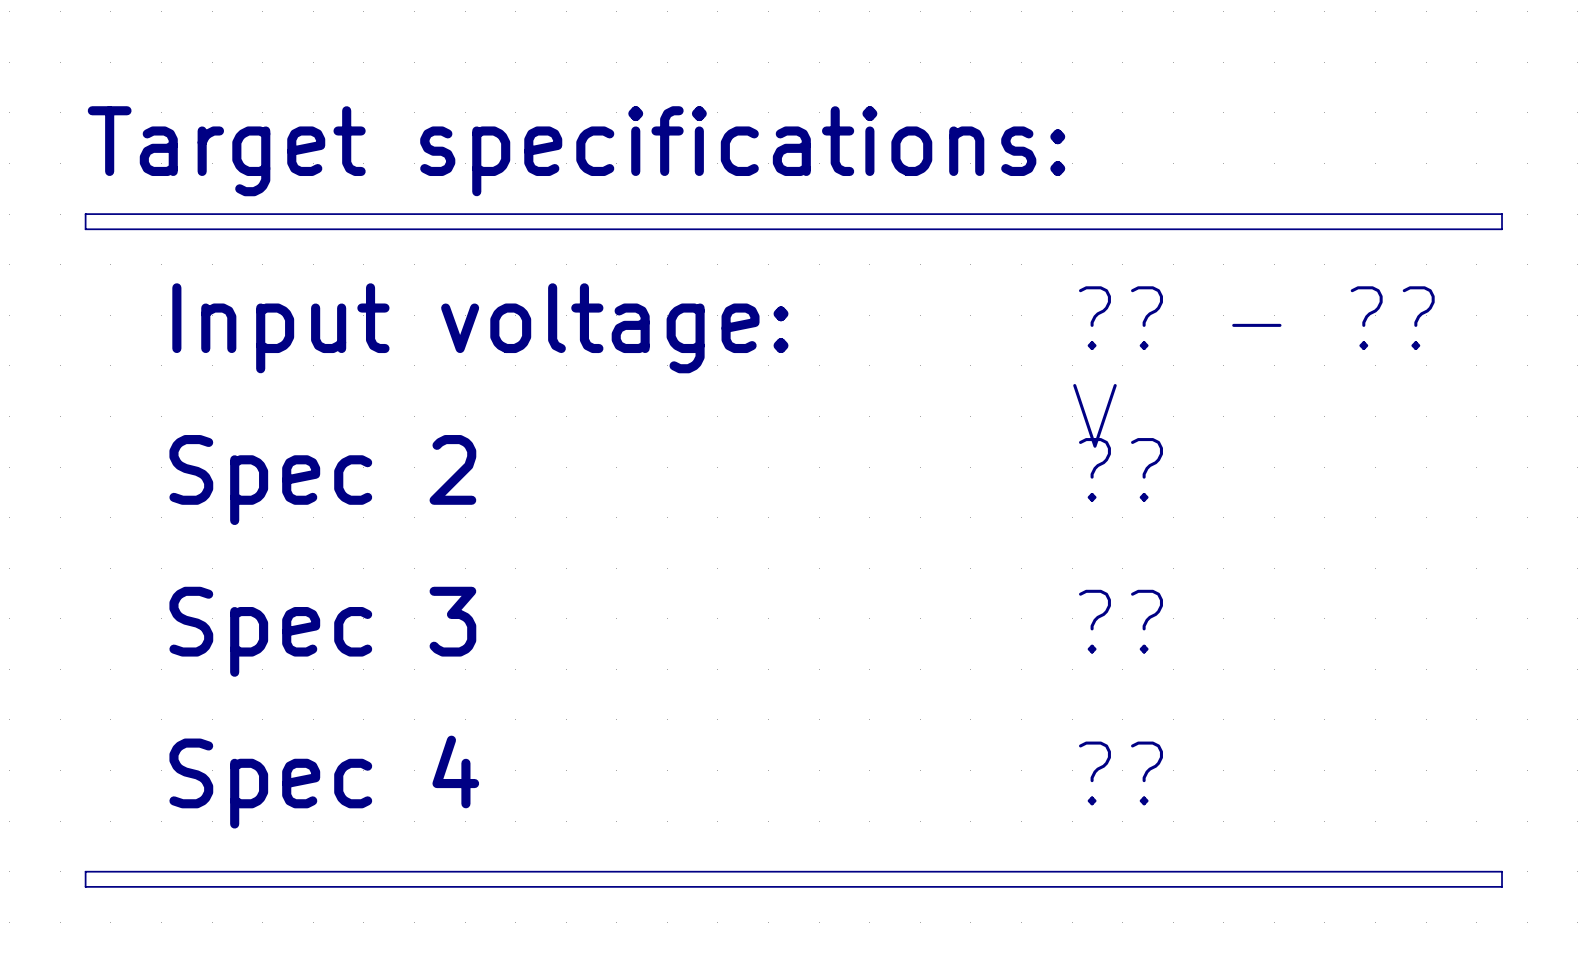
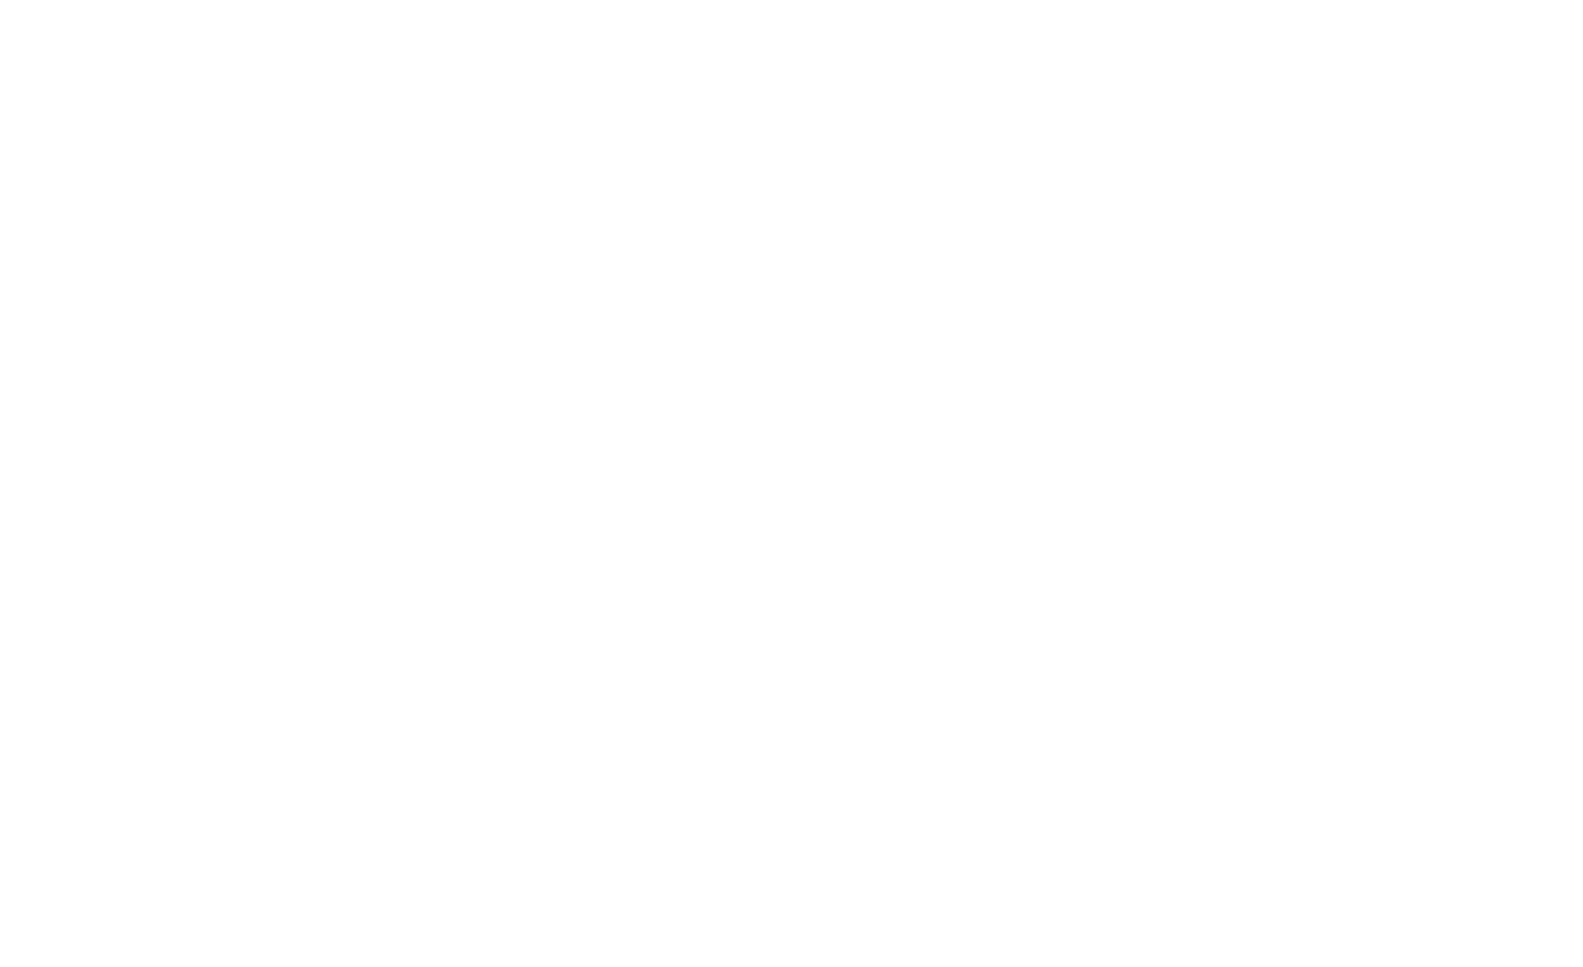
text: Target specifications: (576, 151) -> none
line: (85, 214) (85, 229) (1502, 229) (1502, 214) (85, 214) -> none
text: ?? - ?? (1256, 318) -> none
text: Input voltage: (480, 328) -> none
text: V (1094, 415) -> none
text: ?? (1120, 469) -> none
text: Spec 2 (322, 480) -> none
text: ?? (1120, 621) -> none
text: Spec 3 (322, 631) -> none
text: ?? (1120, 773) -> none
text: Spec 4 (324, 782) -> none
line: (85, 871) (1502, 871) (1502, 886) (85, 886) (85, 871) -> none

